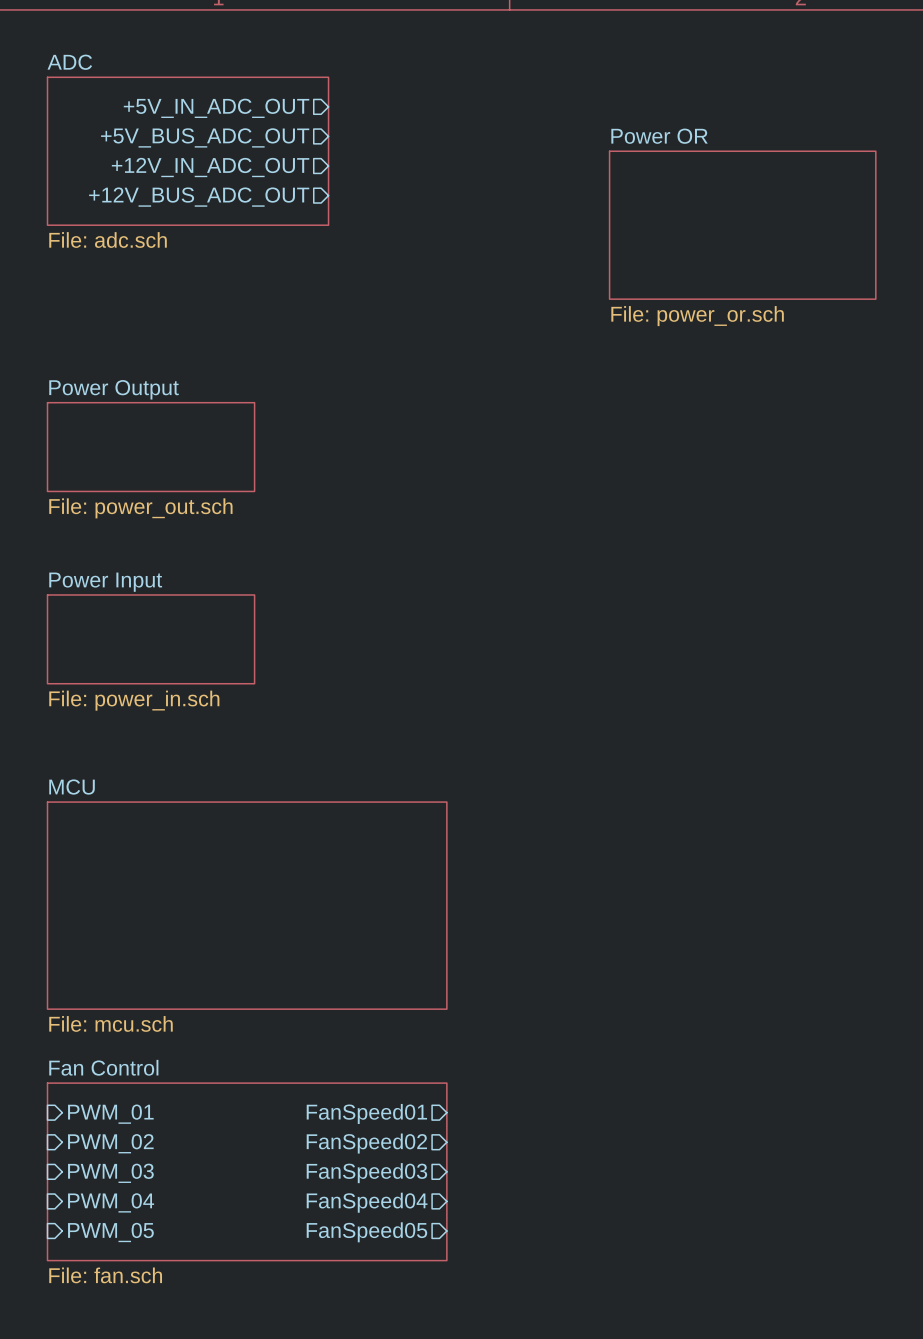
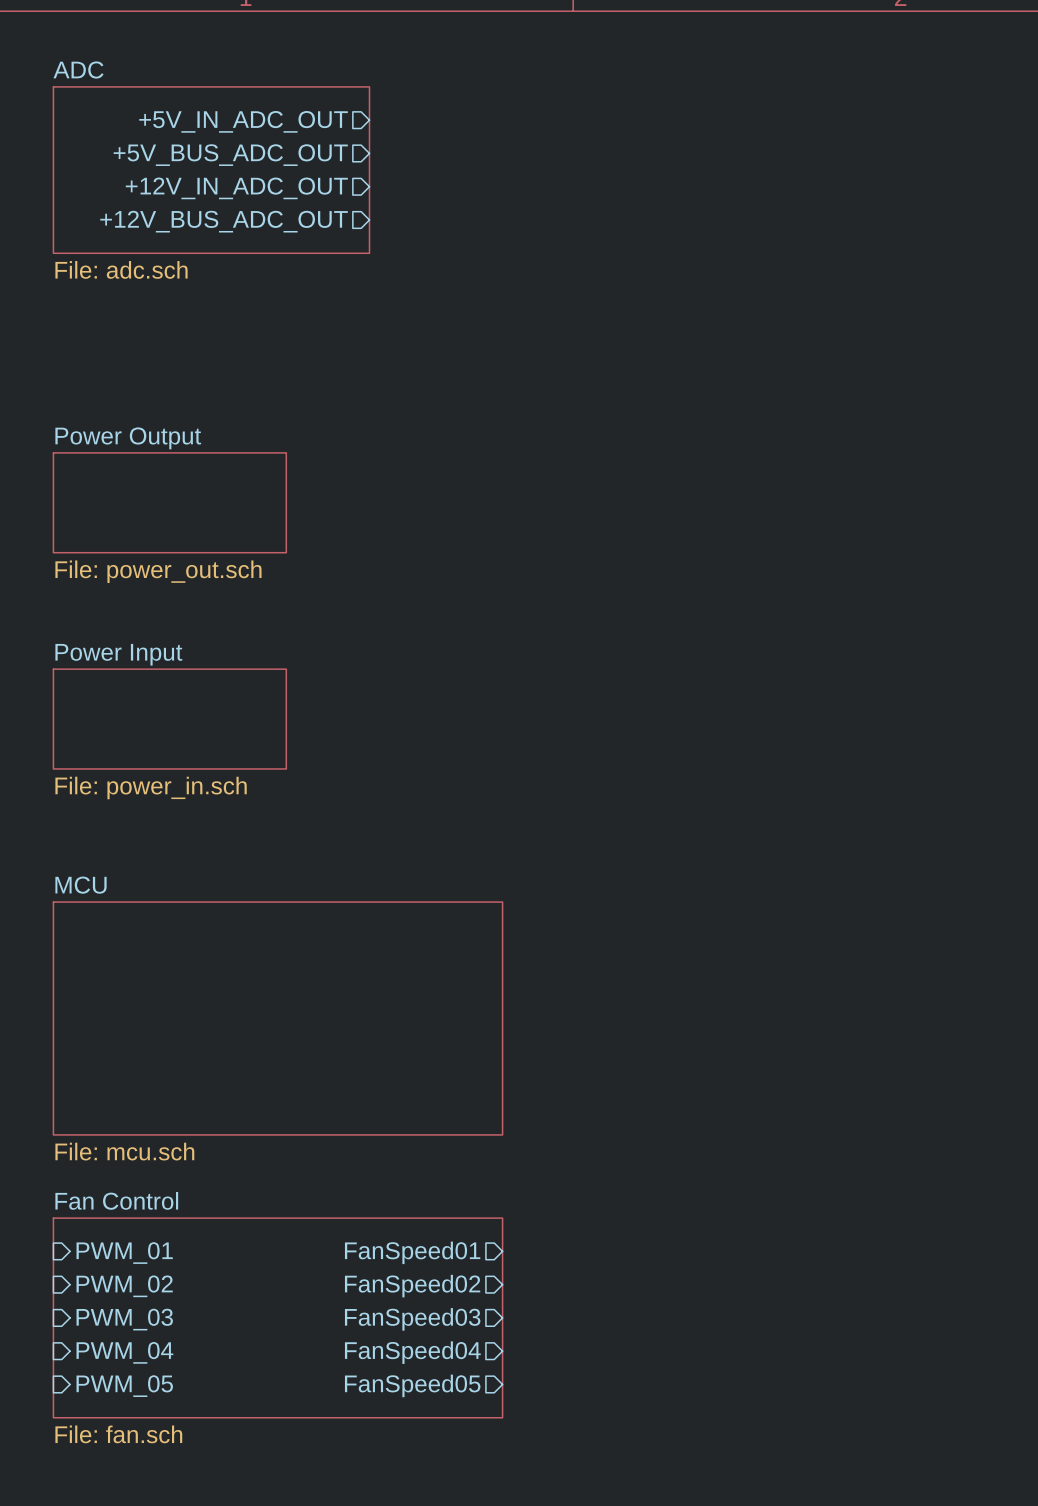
sheet Power OR: File: power_or.sch (742, 225) -> none

